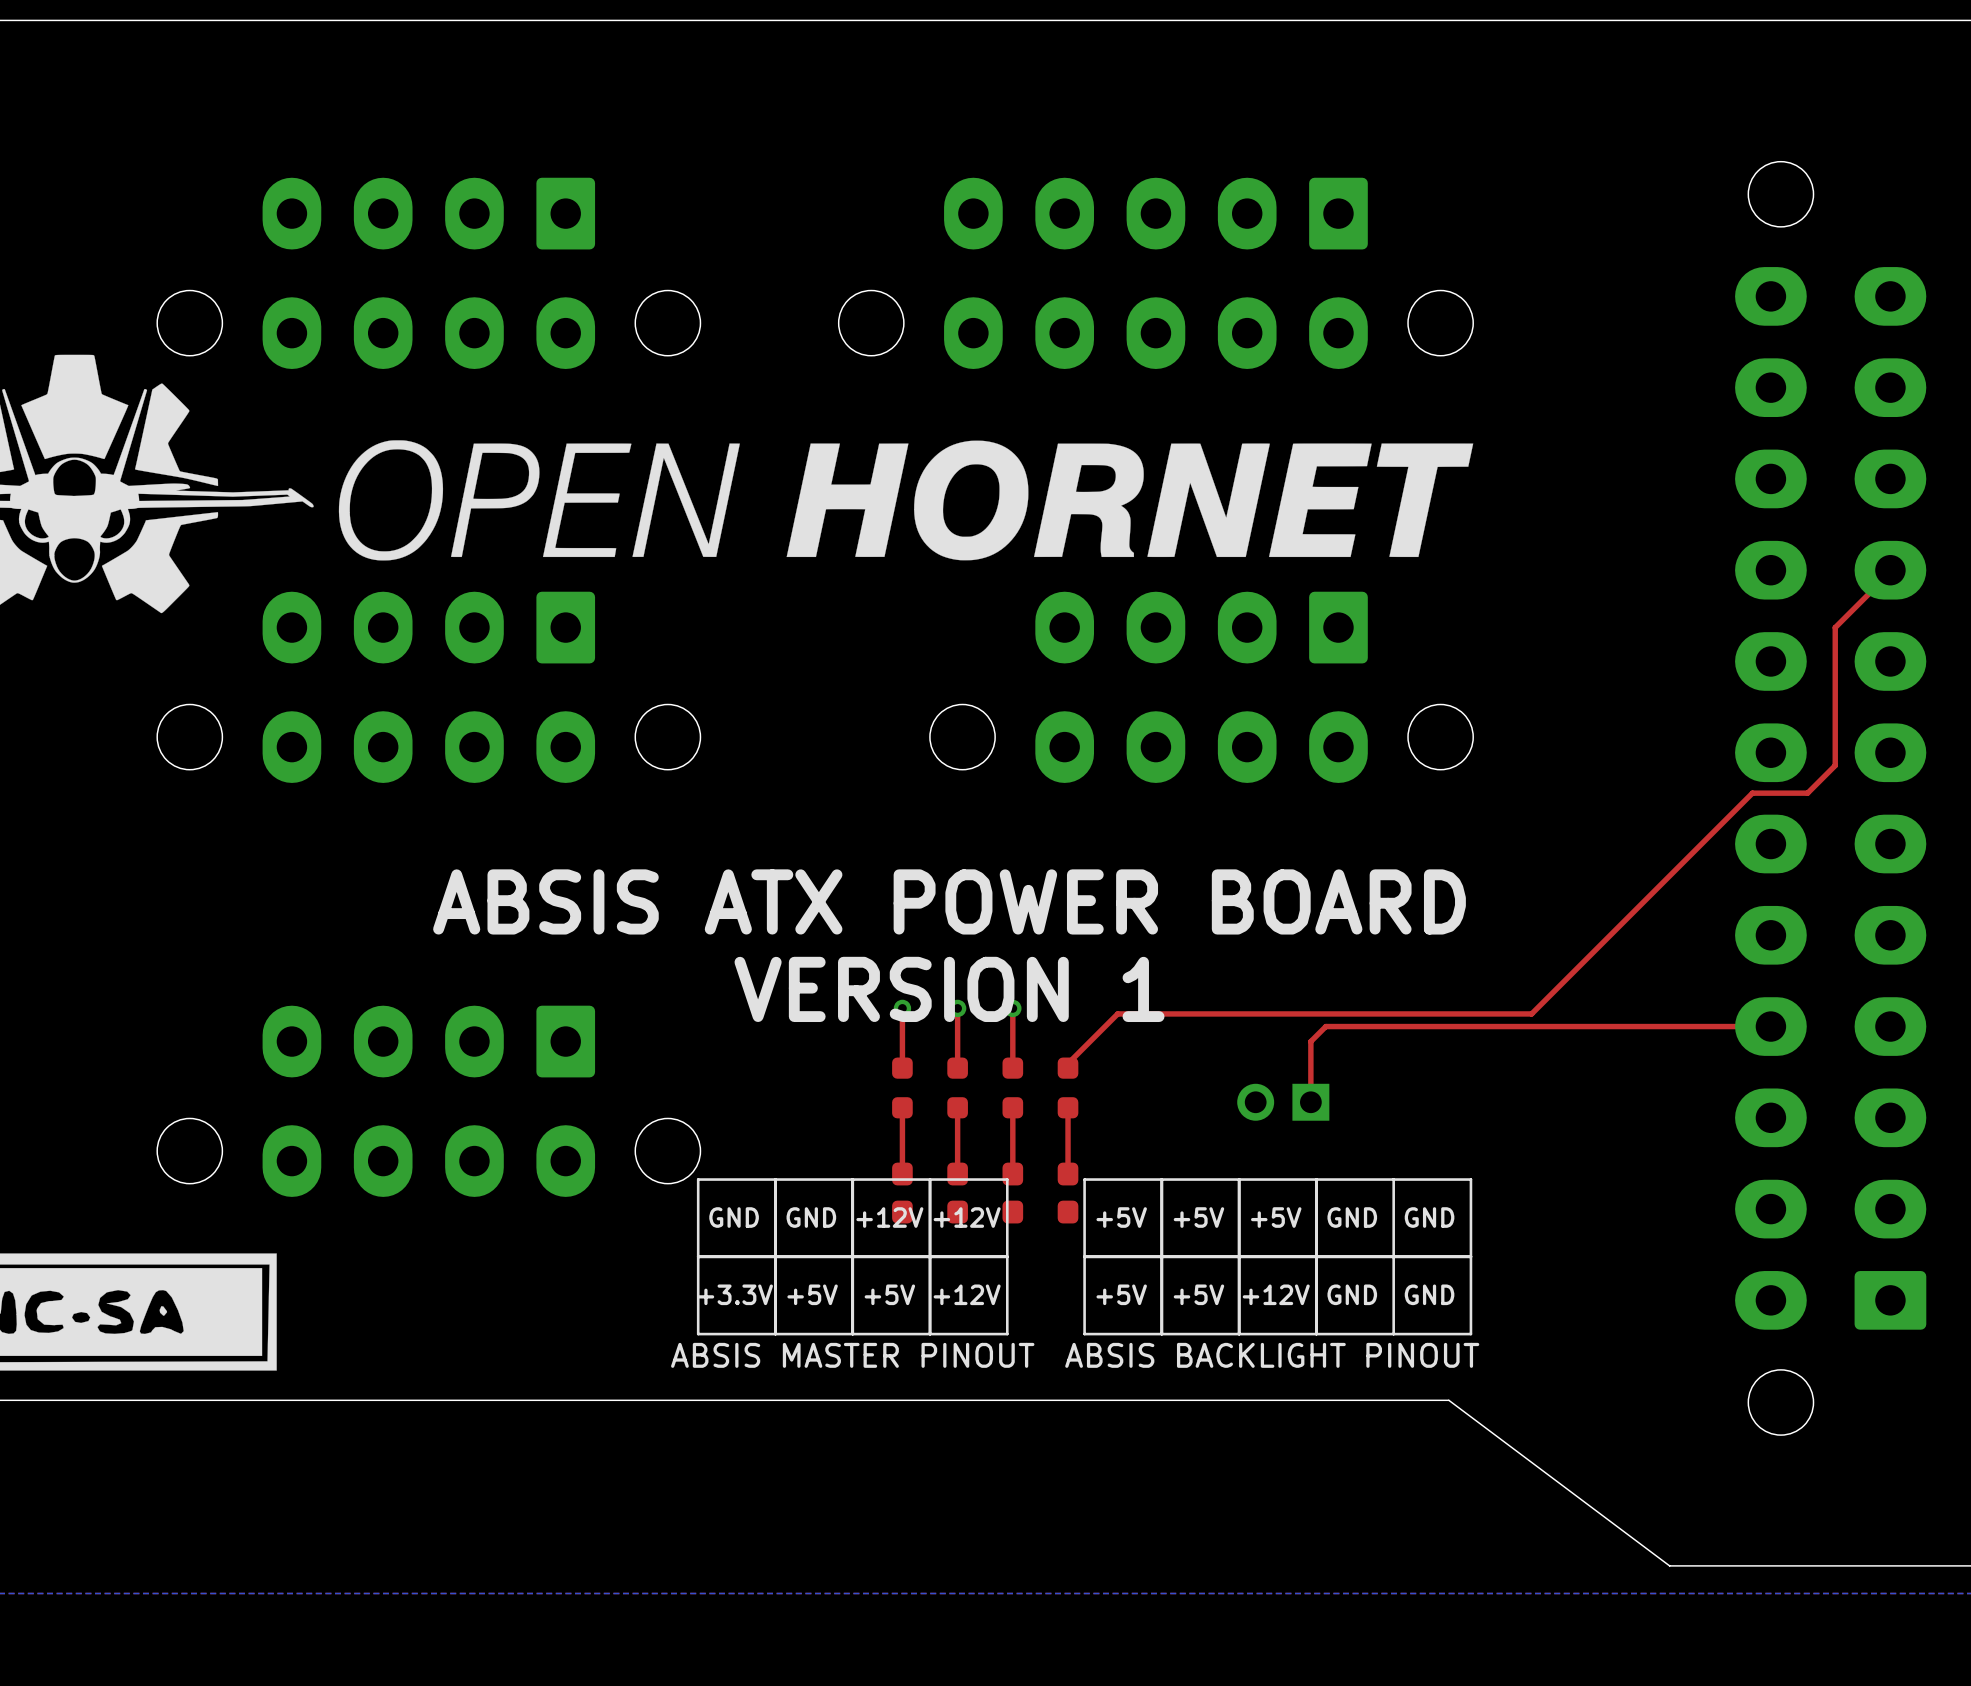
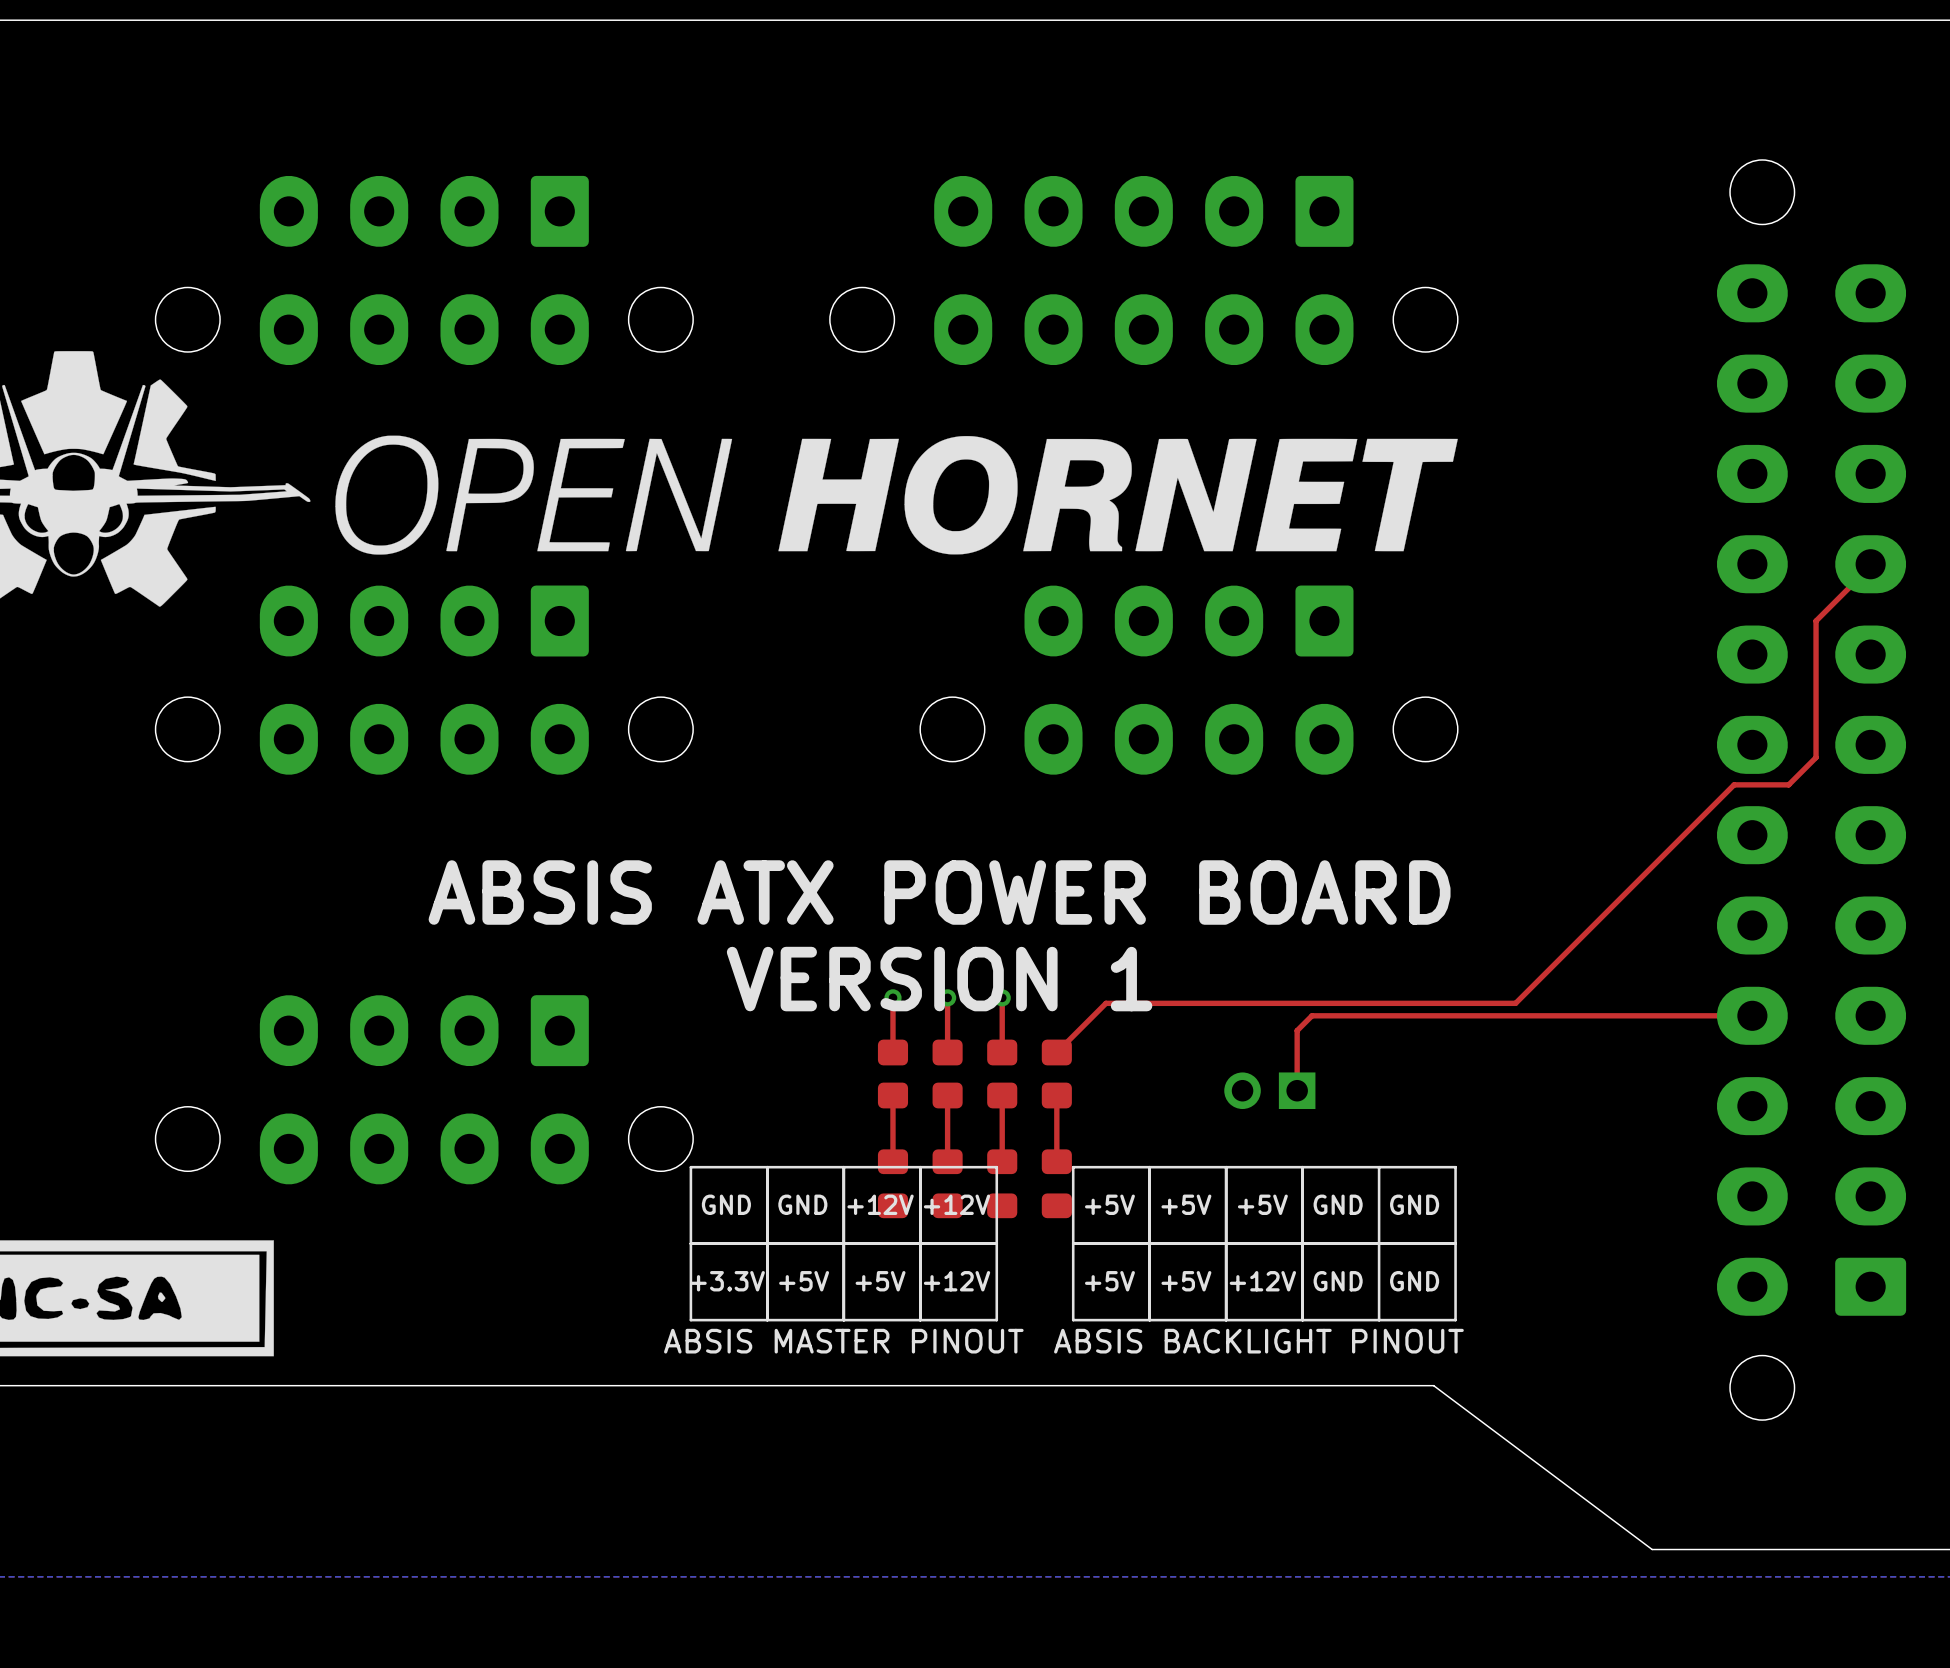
part footprint: [892, 1057, 913, 1119] -> [877, 1039, 909, 1109]
part footprint: [947, 1057, 968, 1119] -> [932, 1039, 963, 1109]
part footprint: [1002, 1057, 1024, 1119] -> [987, 1039, 1018, 1109]
part footprint: [1057, 1057, 1079, 1119] -> [1041, 1039, 1072, 1109]
part footprint: [892, 1162, 913, 1224] -> [877, 1149, 909, 1219]
part footprint: [947, 1162, 968, 1224] -> [932, 1149, 963, 1219]
part footprint: [1002, 1162, 1024, 1224] -> [987, 1149, 1018, 1219]
part footprint: [1057, 1162, 1079, 1224] -> [1041, 1149, 1072, 1219]

